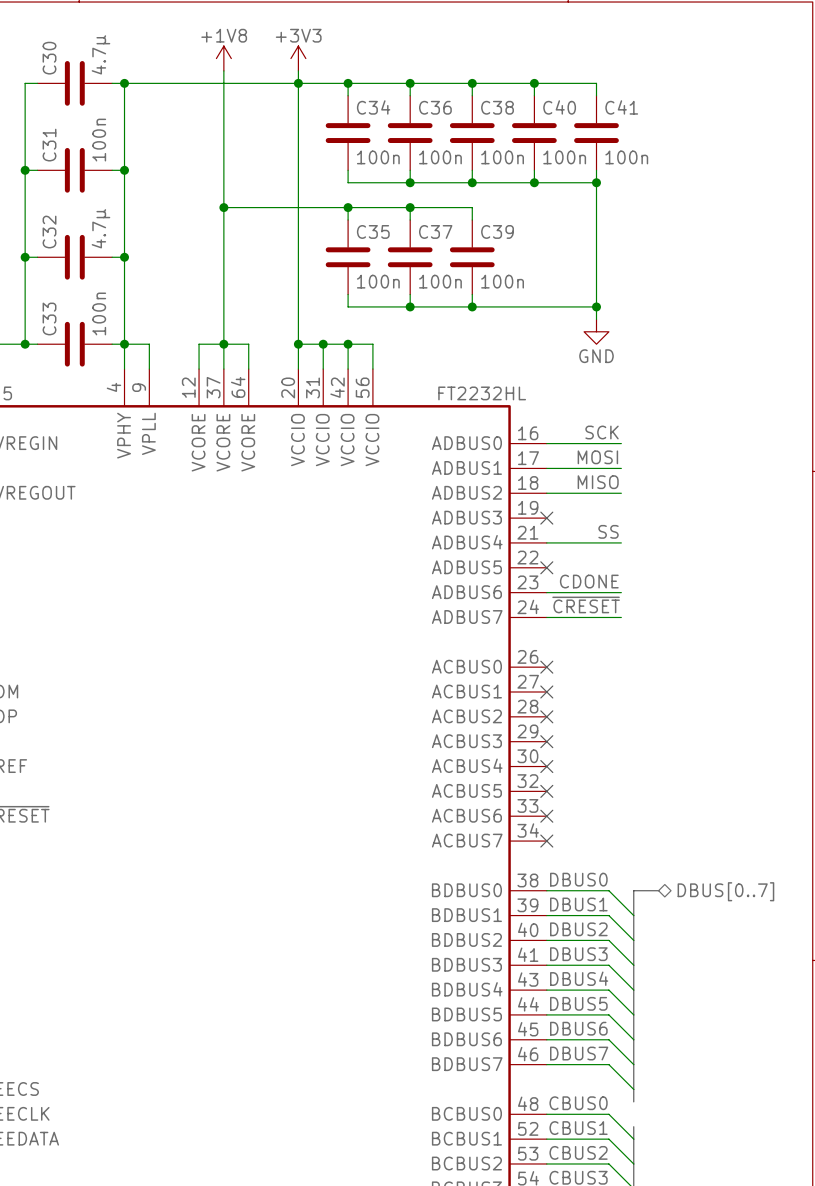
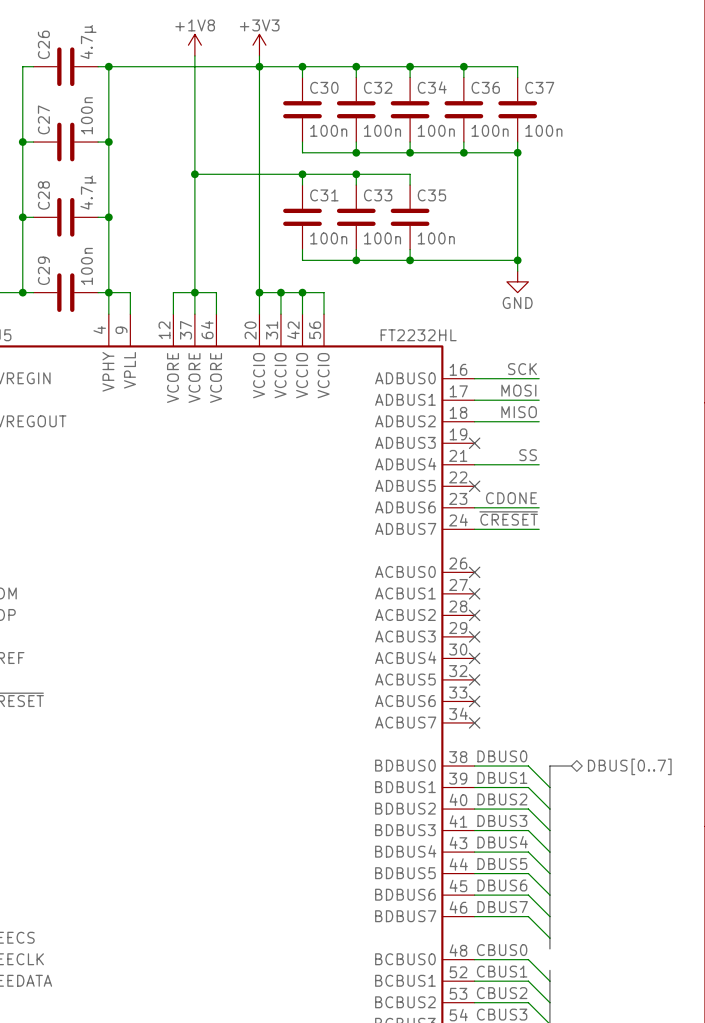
C30 name: C30 (49, 58) -> C26 (43, 44)
C34 name: C34 (373, 107) -> C30 (324, 87)
C36 name: C36 (435, 107) -> C32 (378, 87)
C38 name: C38 (497, 107) -> C34 (432, 87)
C40 name: C40 (559, 107) -> C36 (485, 87)
C41 name: C41 (621, 107) -> C37 (539, 87)
C31 name: C31 (49, 145) -> C27 (43, 119)
C35 name: C35 (373, 231) -> C31 (324, 195)
C37 name: C37 (435, 231) -> C33 (378, 195)
C39 name: C39 (497, 231) -> C35 (431, 195)
C32 name: C32 (49, 232) -> C28 (43, 195)
C33 name: C33 (49, 318) -> C29 (43, 270)

